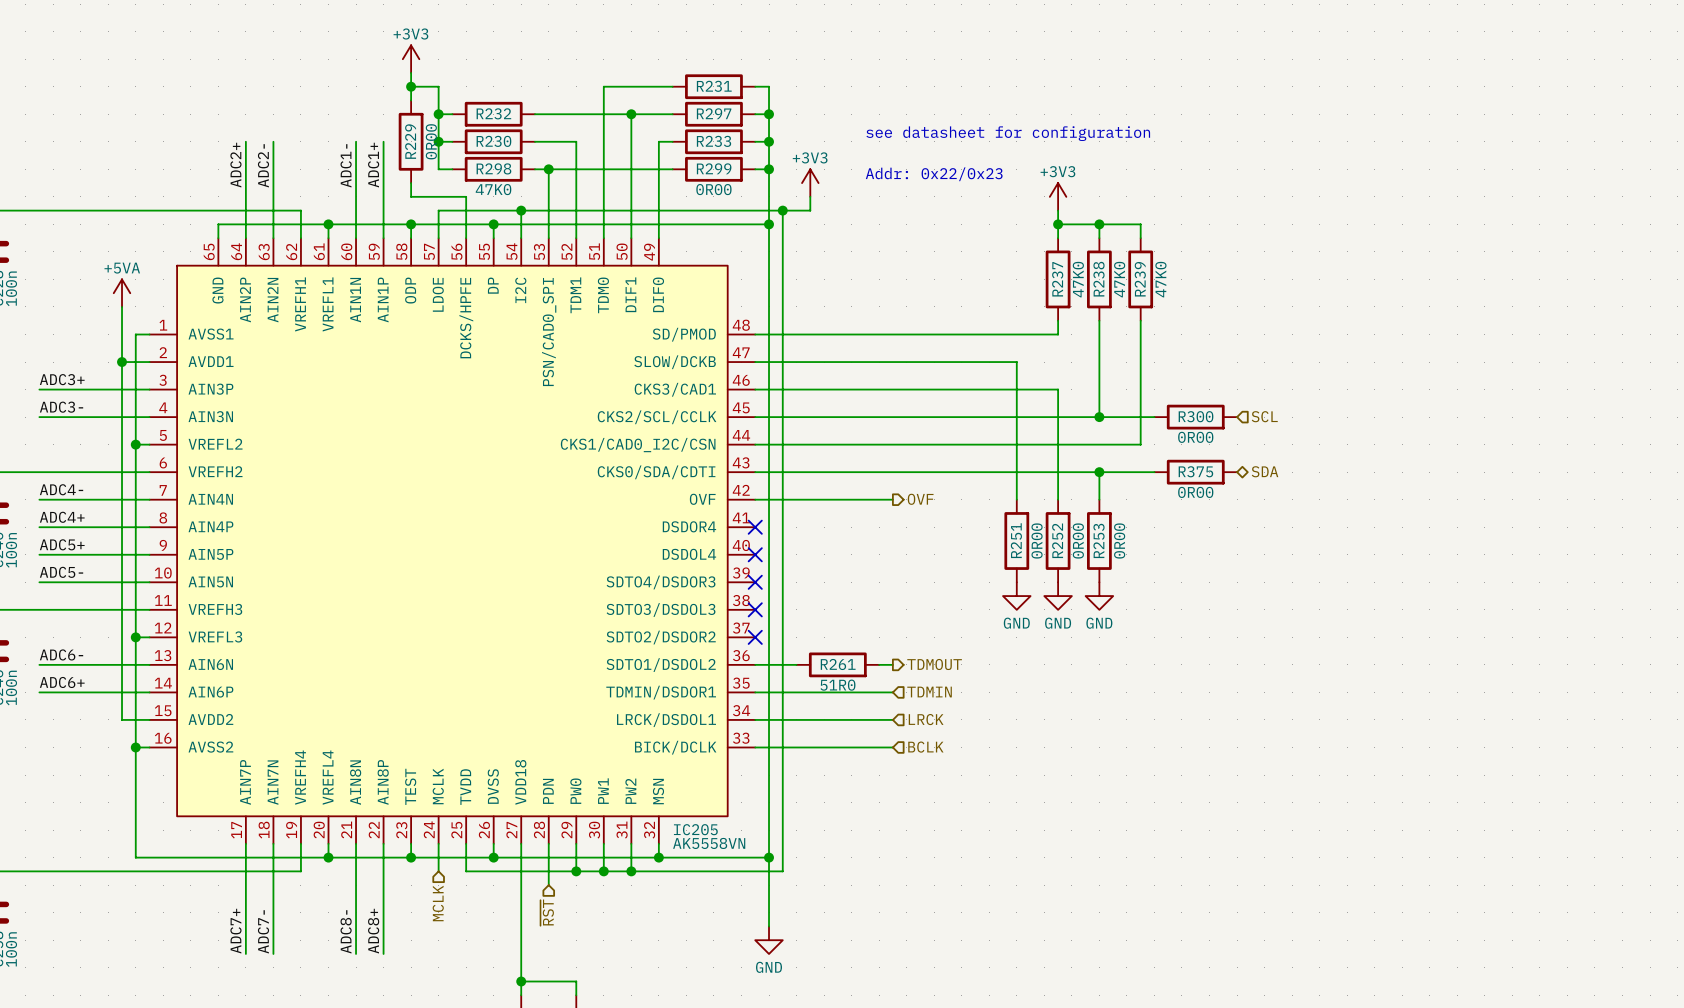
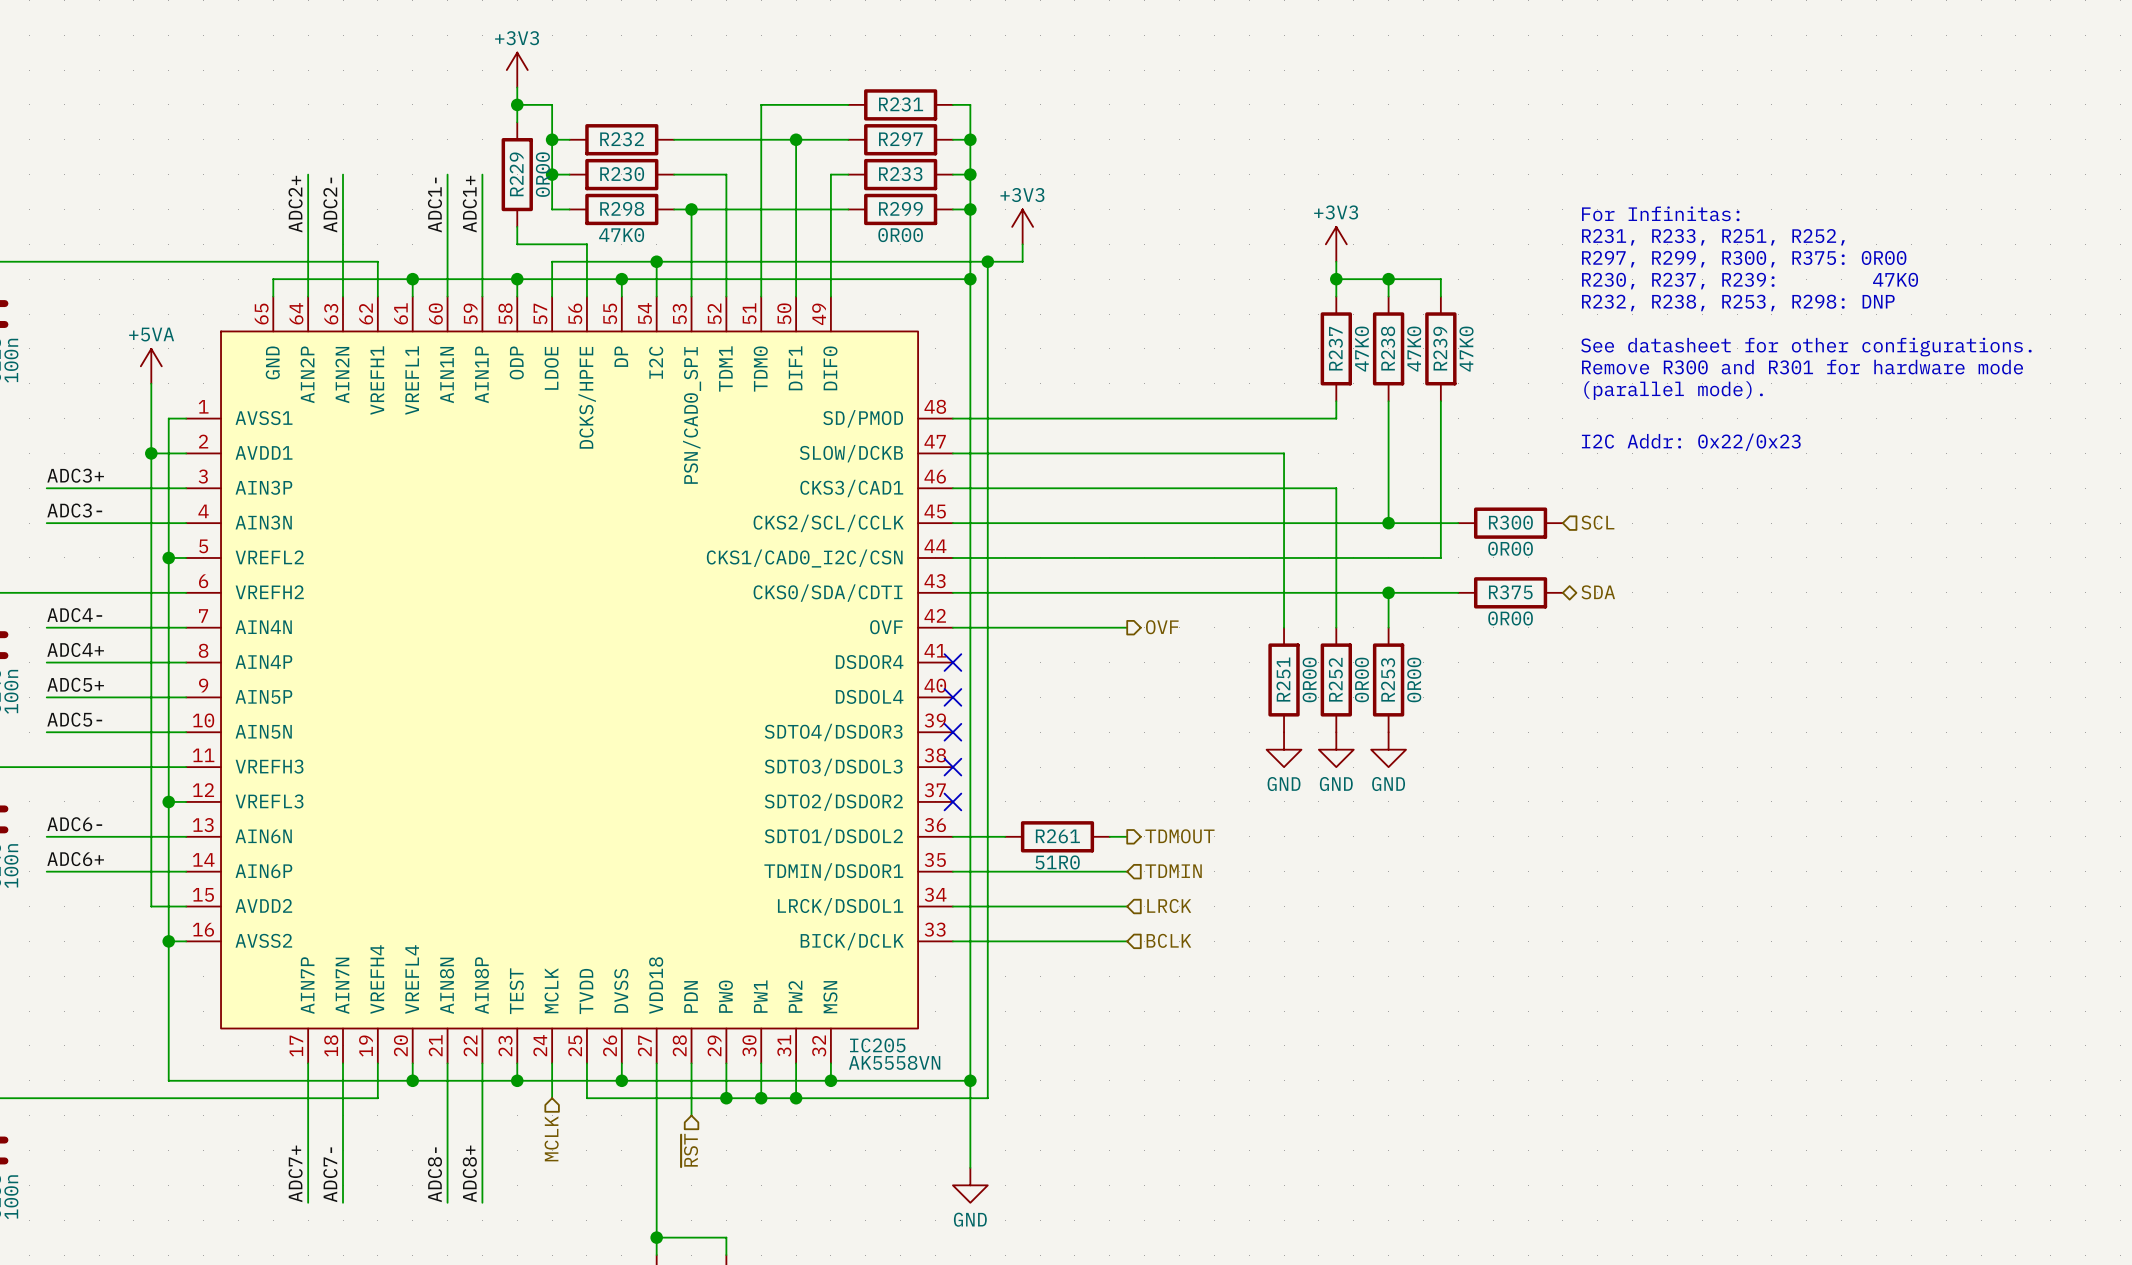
text: see datasheet for configuration (1008, 133) -> none
text: none -> For Infinitas: (1660, 213)
text: Addr: 0x22/0x23 (934, 174) -> none
text: none -> R231, R233, R251, R252, (1713, 237)
text: none -> R297, R299, R300, R375: 0R00 (1744, 259)
text: none -> R230, R237, R239: 47K0 (1750, 281)
text: none -> R232, R238, R253, R298: DNP (1738, 302)
text: none -> See datasheet for other configurations. (1806, 347)
text: none -> Remove R300 and R301 for hardware mode (1802, 367)
text: none -> (parallel mode). (1673, 390)
text: none -> I2C Addr: 0x22/0x23 (1691, 442)

